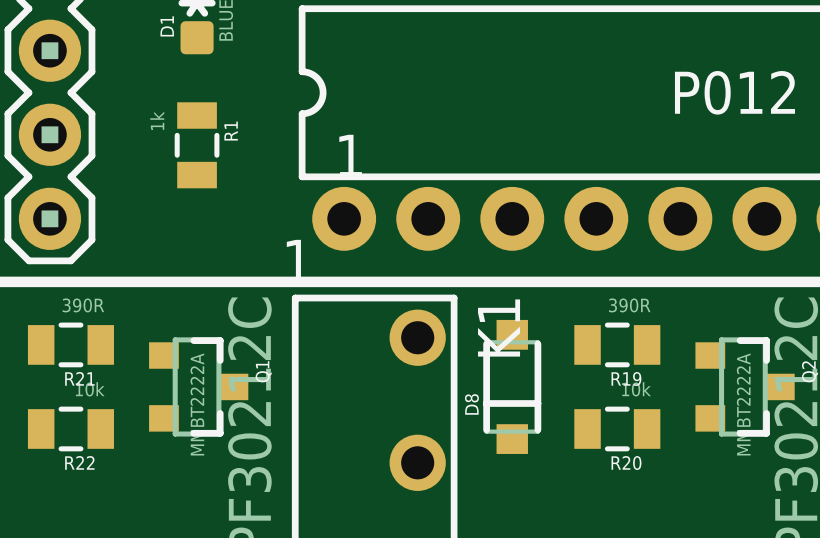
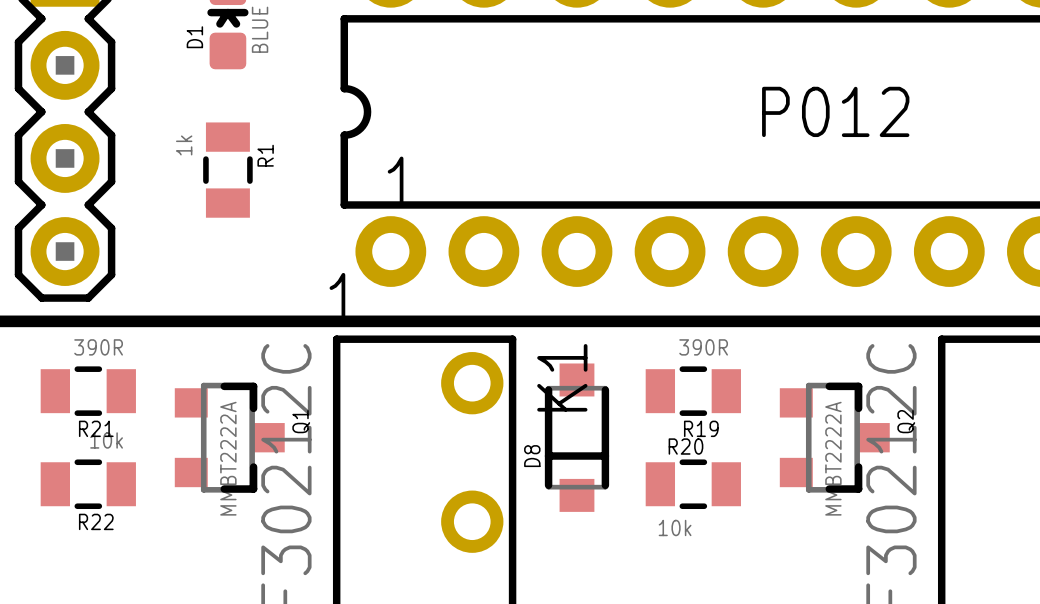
R20 value position: 10k (636, 389) -> 10k (675, 527)
R20 name position: R20 (626, 463) -> R20 (685, 446)

